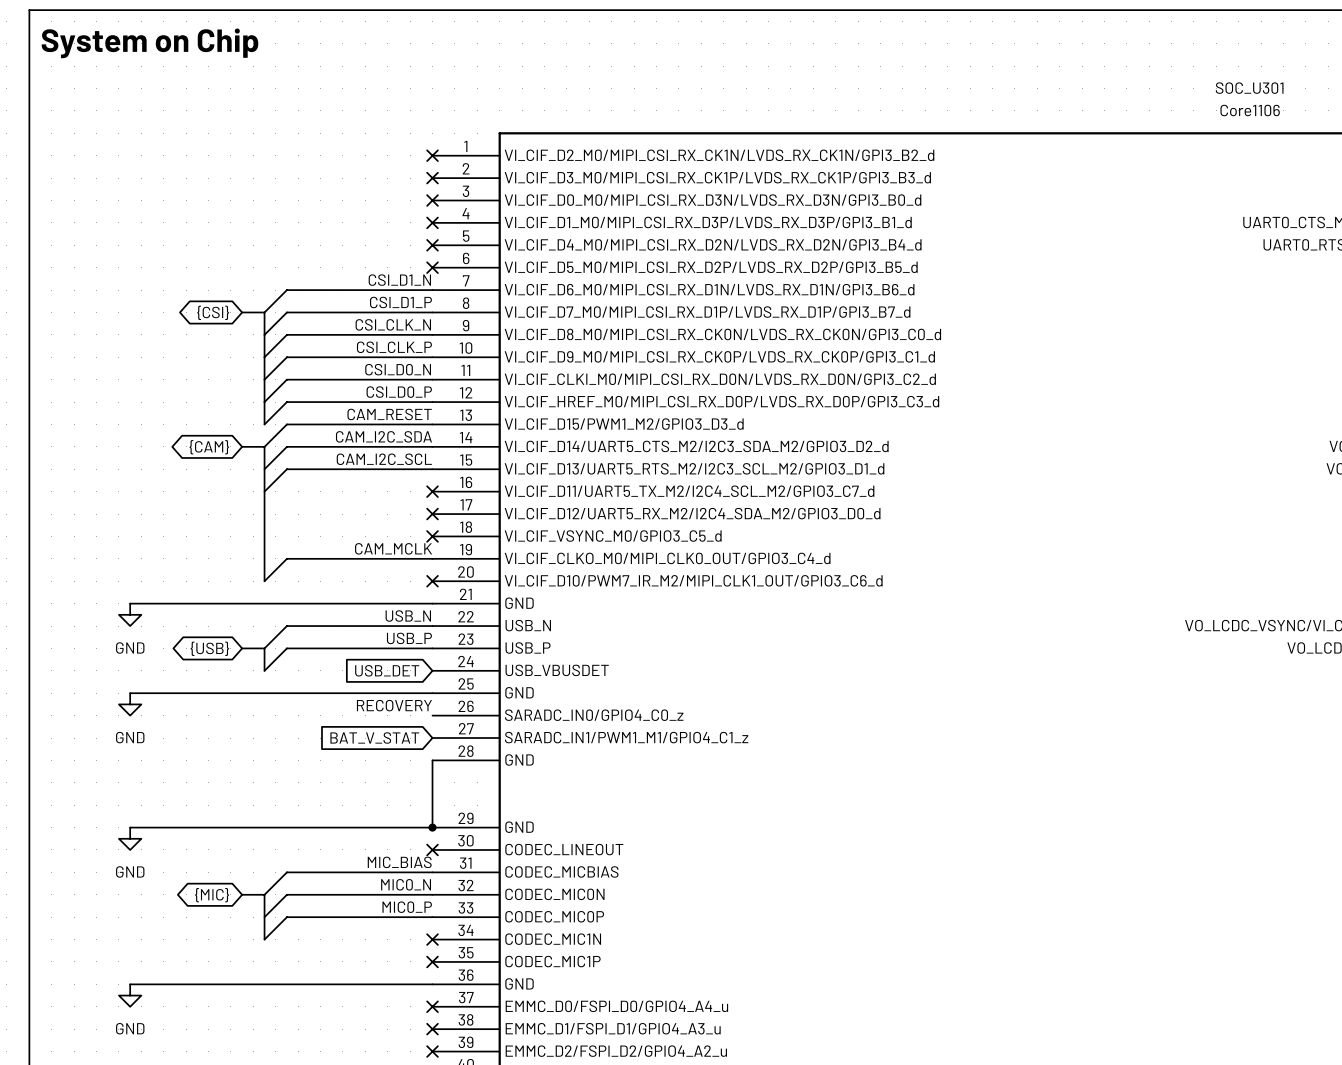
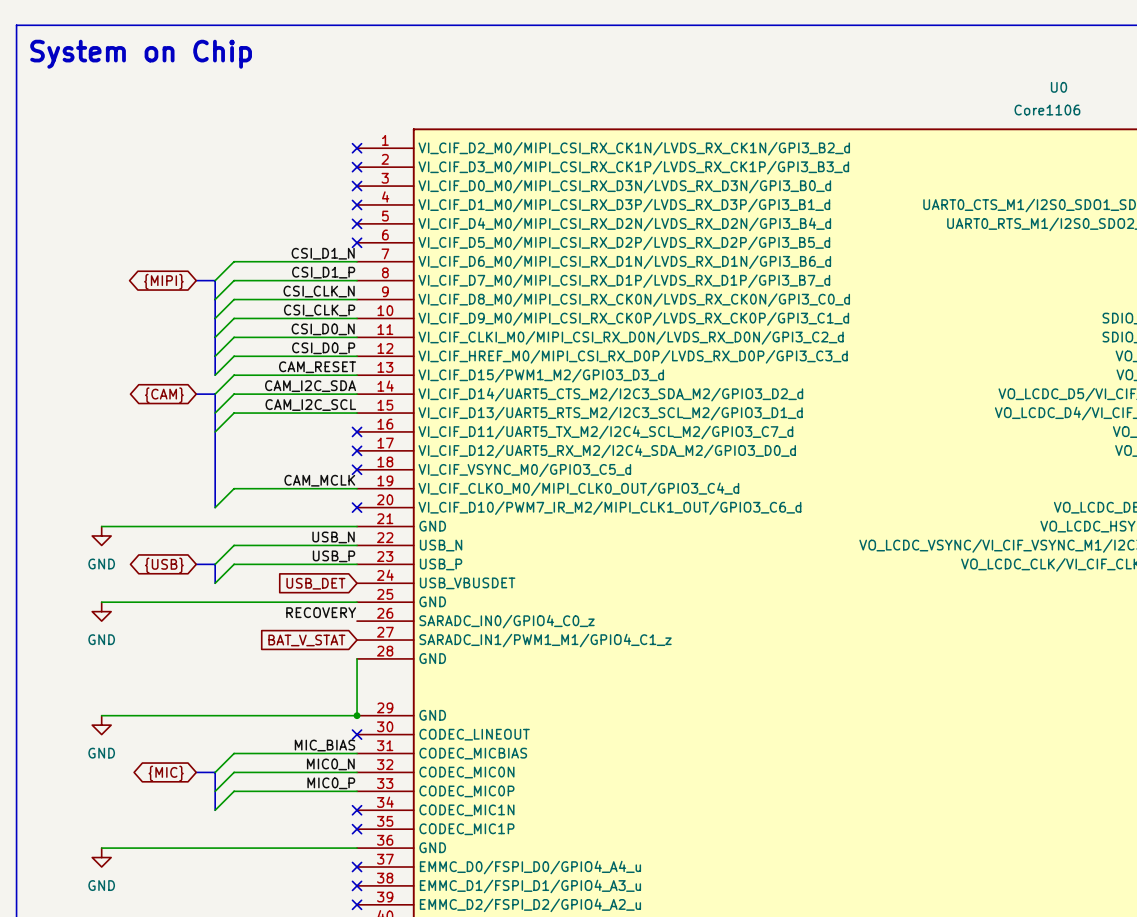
SOC_U301 name: SOC_U301 (1249, 88) -> U0 (1059, 87)
global label: {CSI} (213, 312) -> {MIPI} (163, 281)

